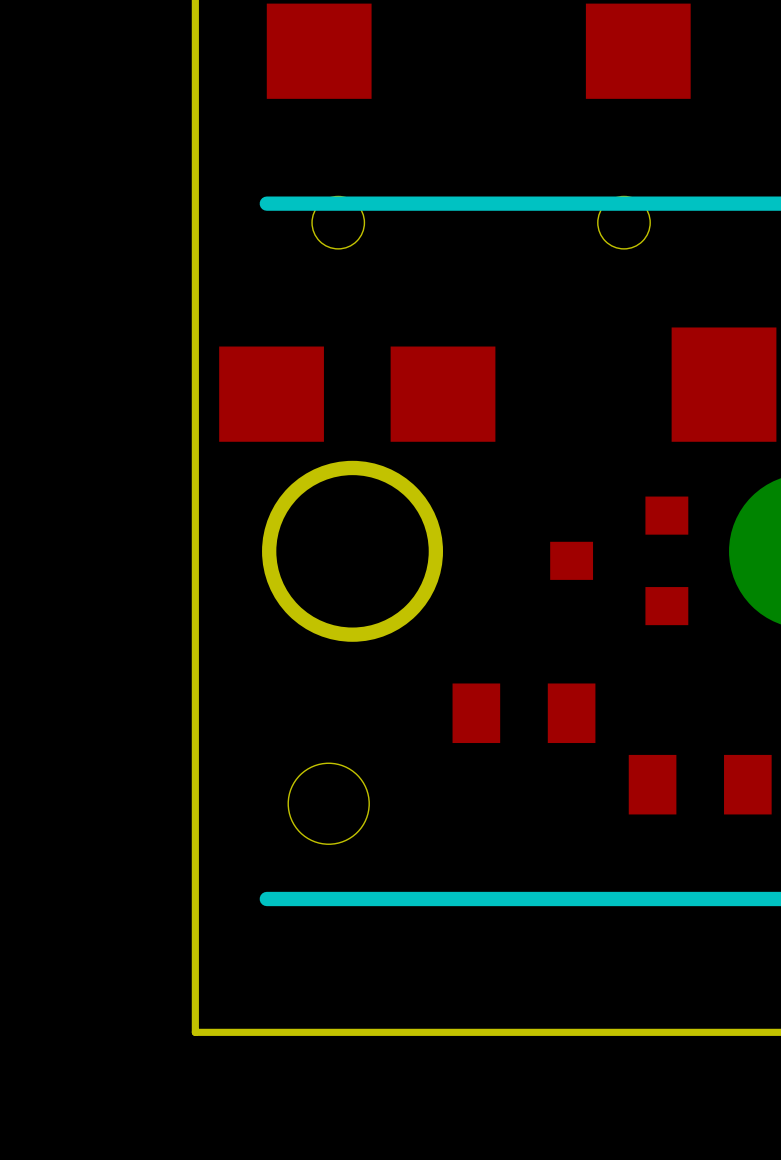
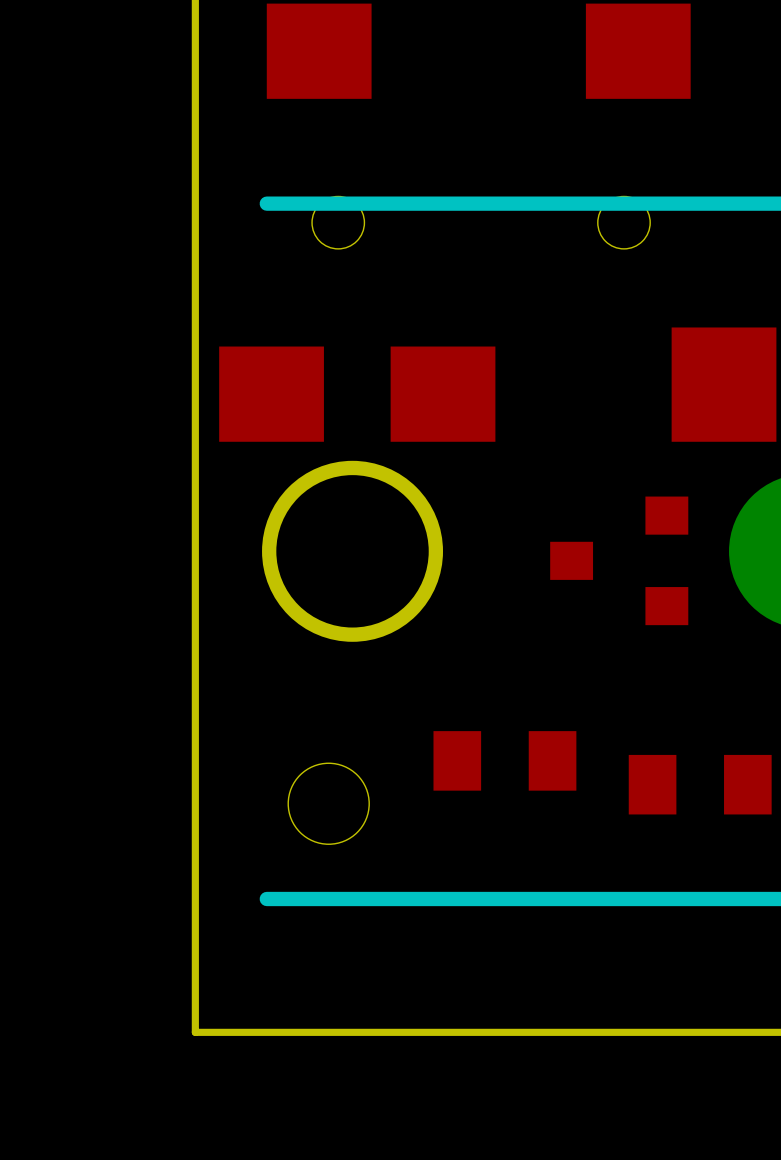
part position: (523, 713) -> (504, 760)

